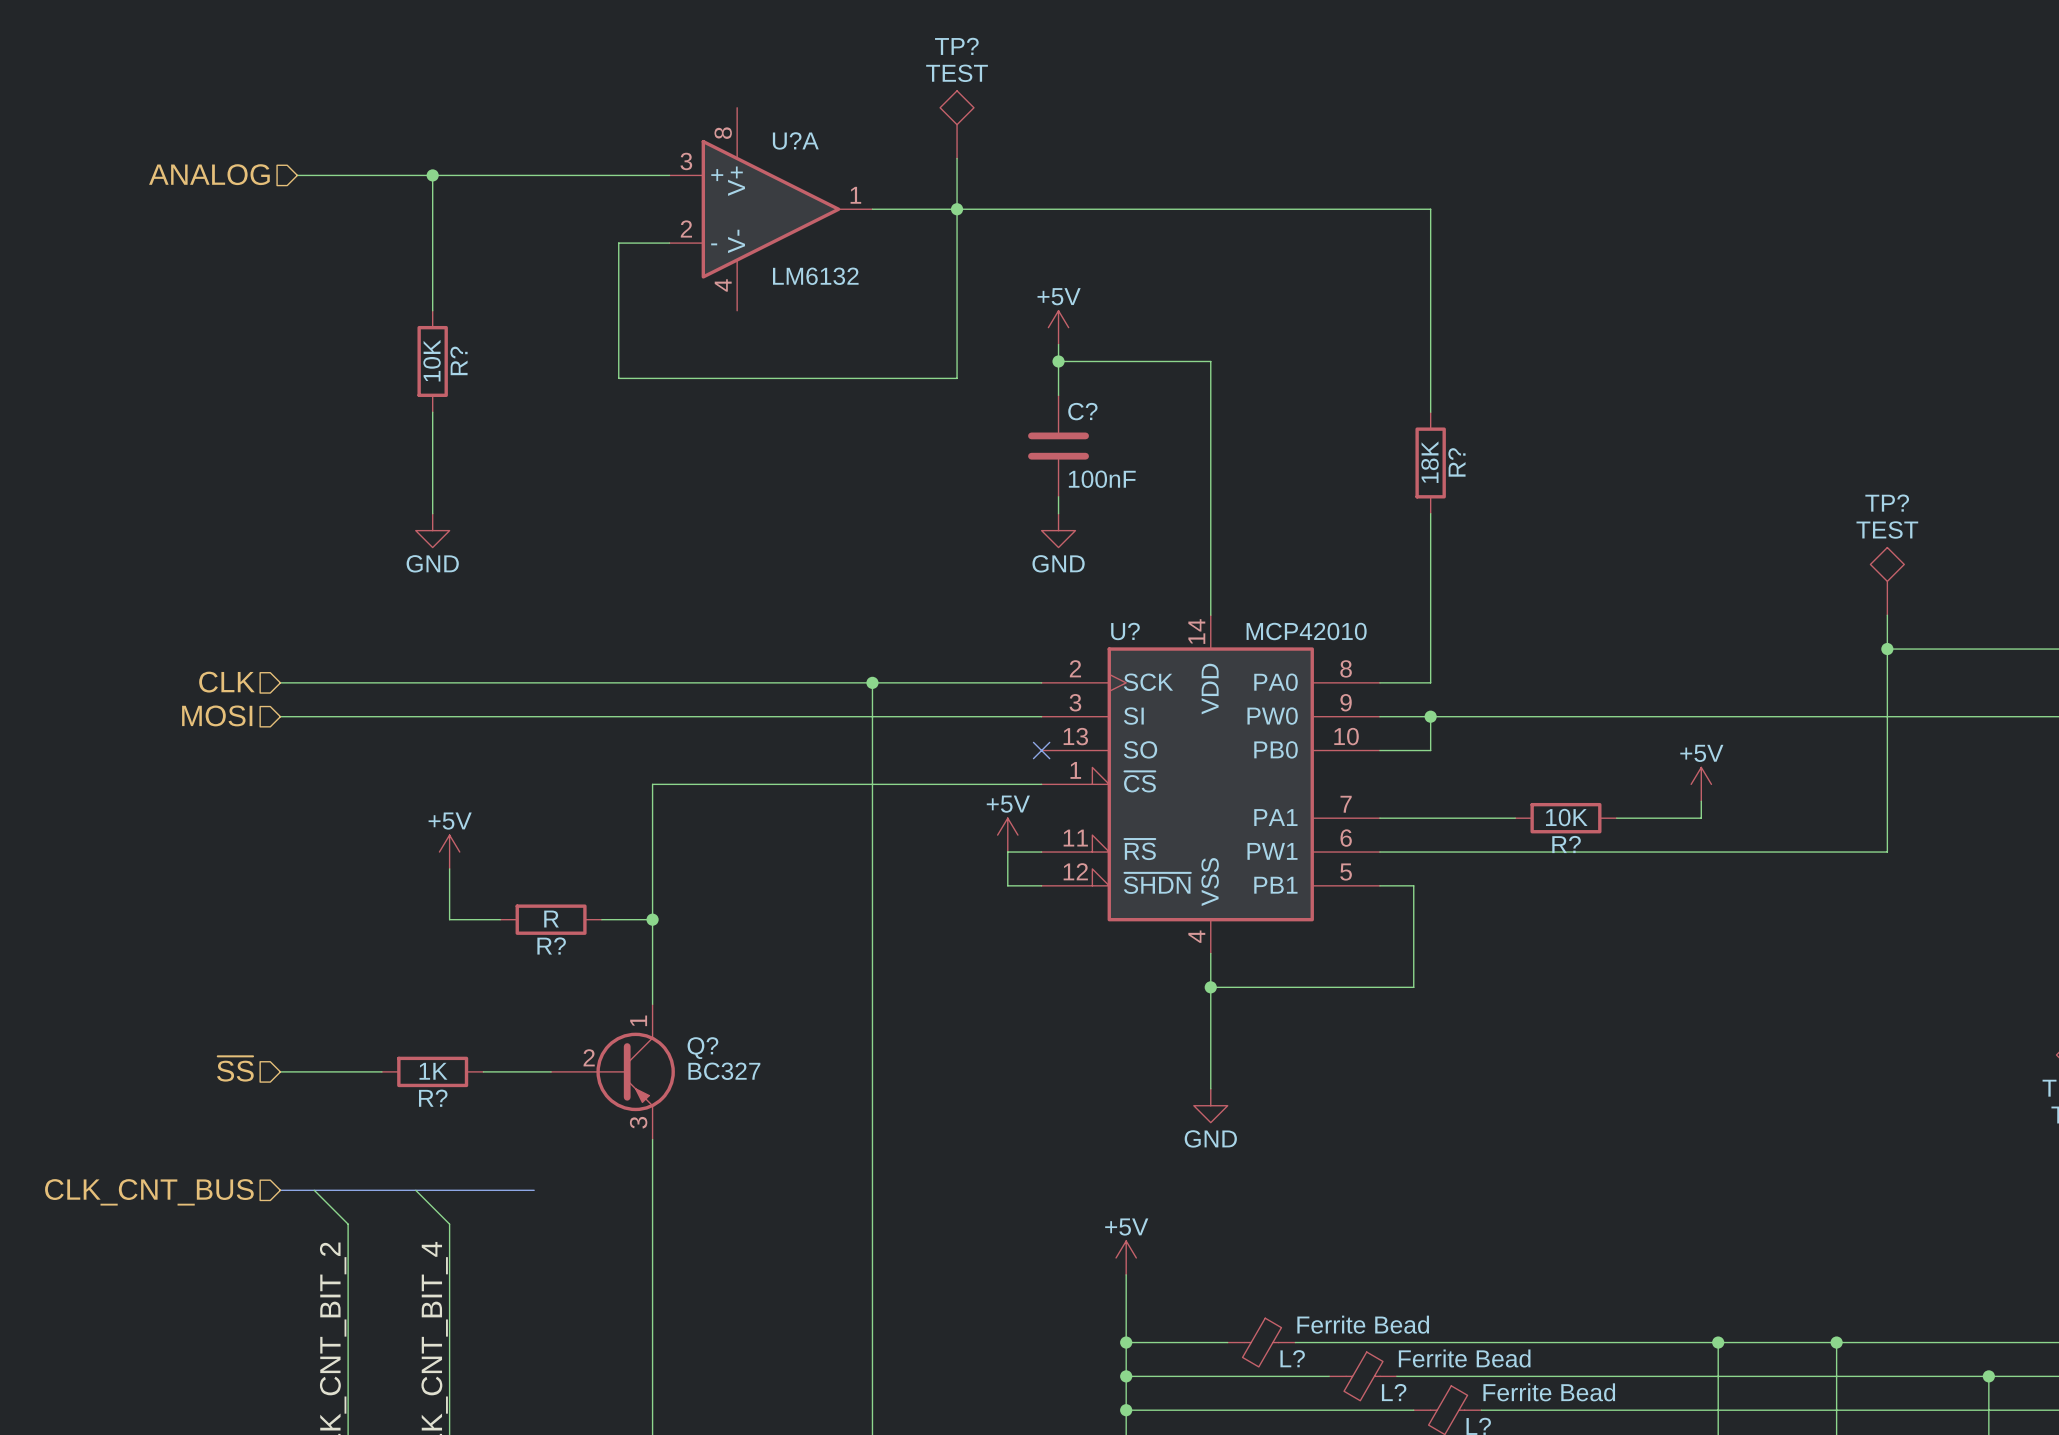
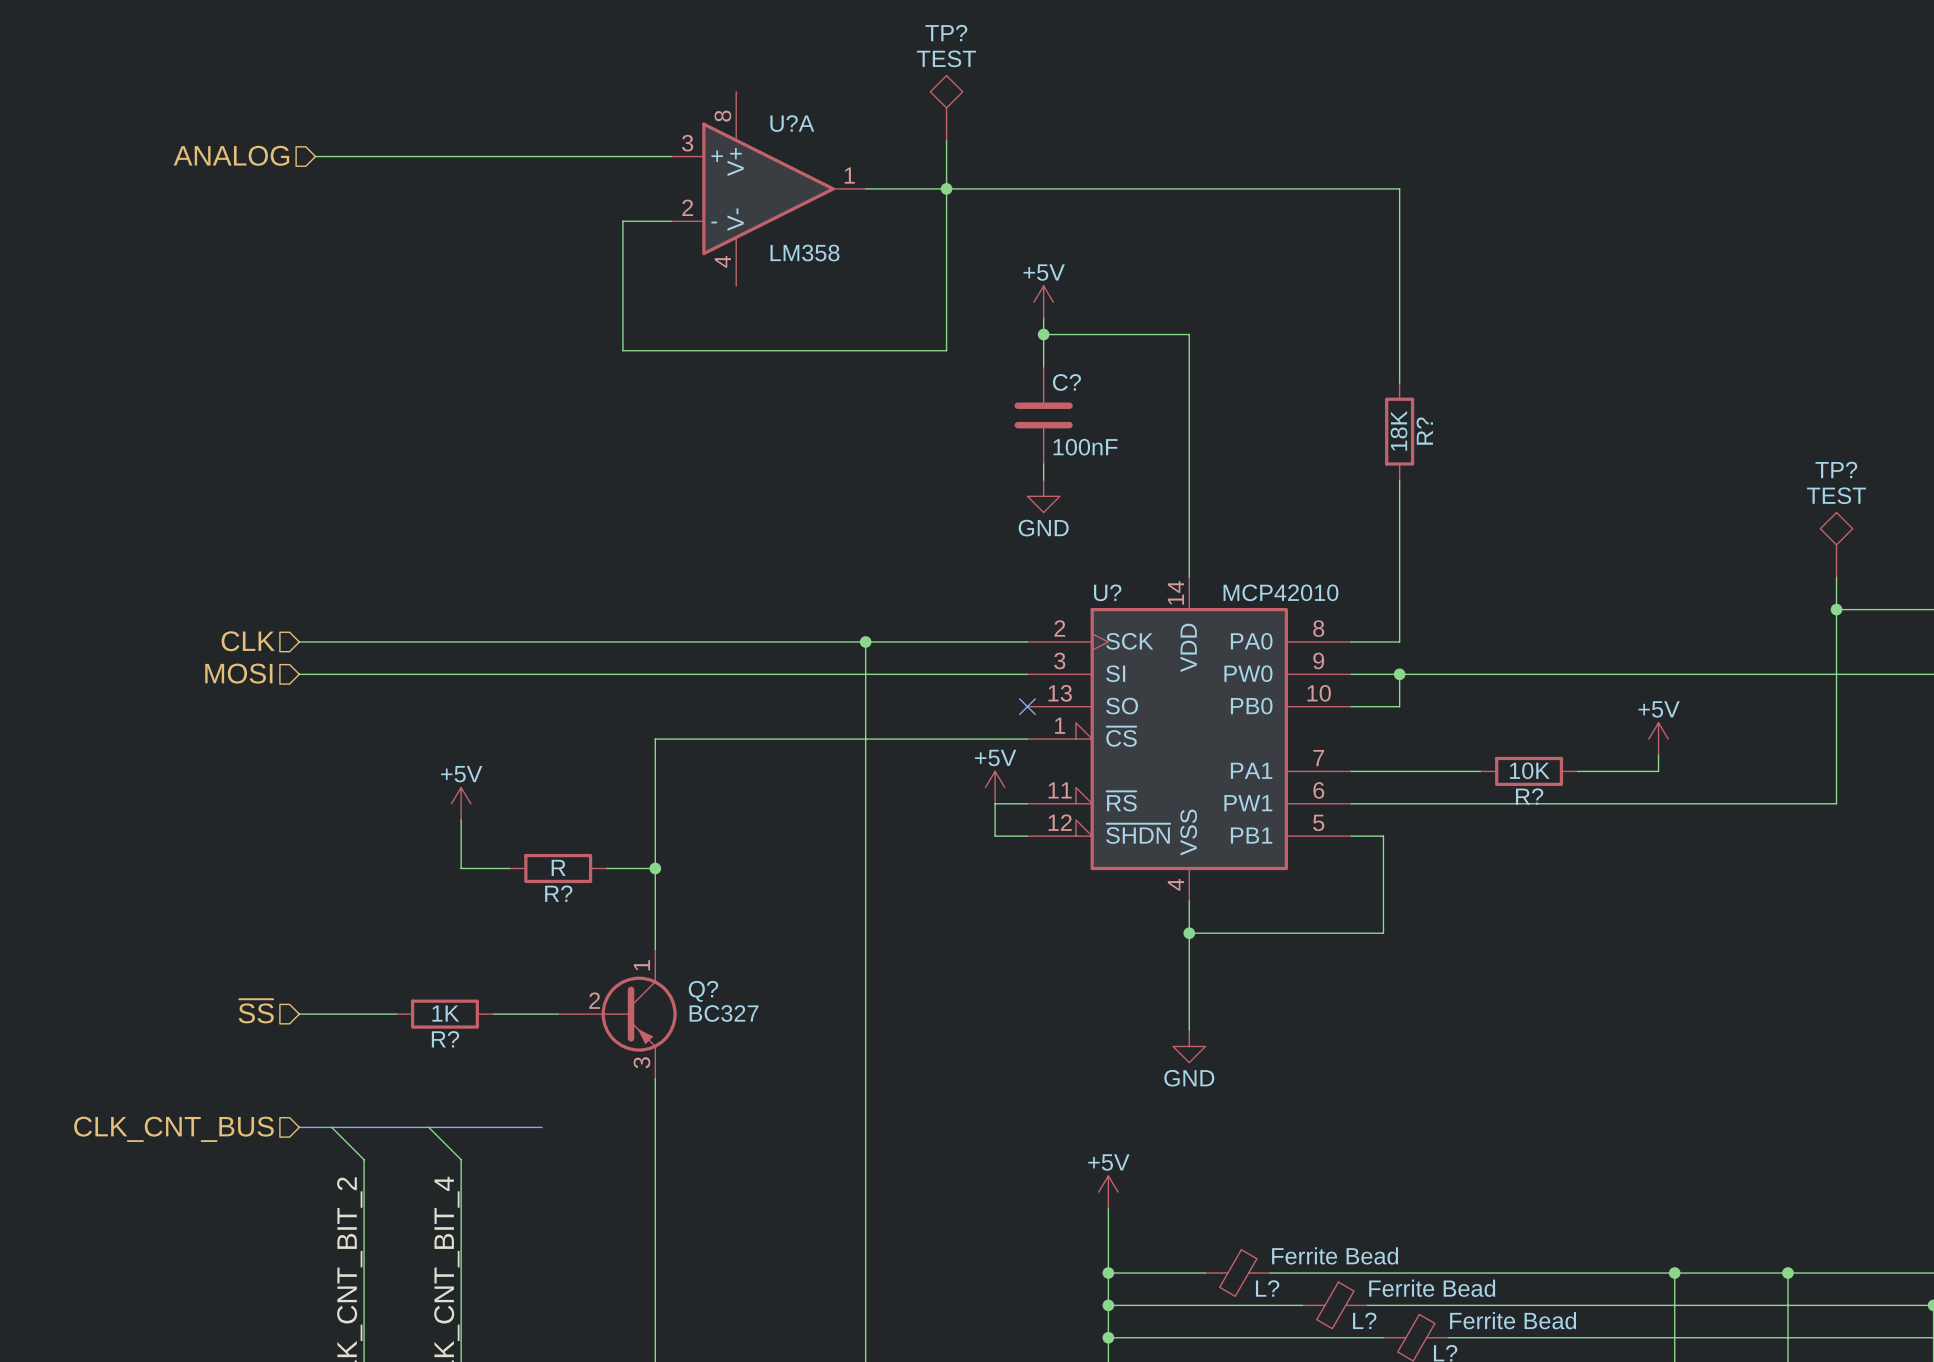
wire: (432, 175) (432, 310) -> none
junction: (432, 175) -> none
U?A value: LM6132 (815, 276) -> LM358 (804, 253)
R?: 10K (432, 361) -> none
wire: (432, 412) (432, 513) -> none
power symbol: GND (432, 530) -> none

